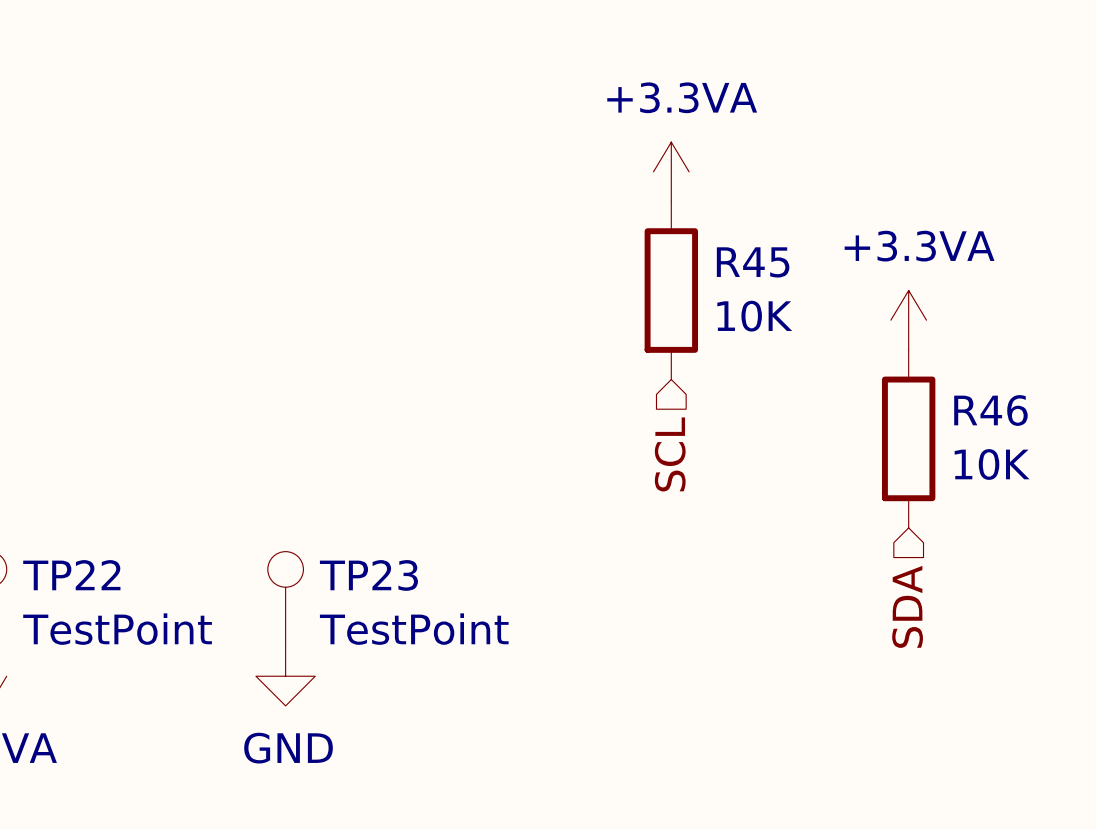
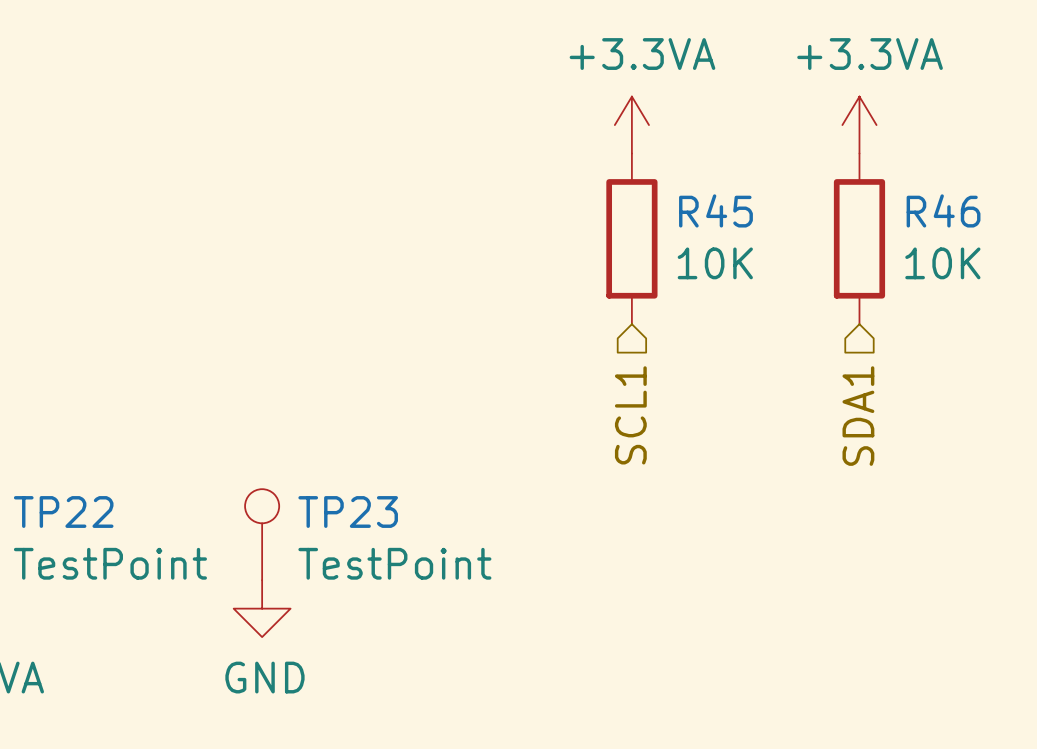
power symbol position: +3.3VA (908, 320) -> +3.3VA (859, 125)
R46 position: (908, 438) -> (859, 238)
hierarchical label: SCL (670, 454) -> SCL1 (630, 415)
hierarchical label: none -> SDA1 (858, 416)
hierarchical label: SDA (907, 606) -> none

